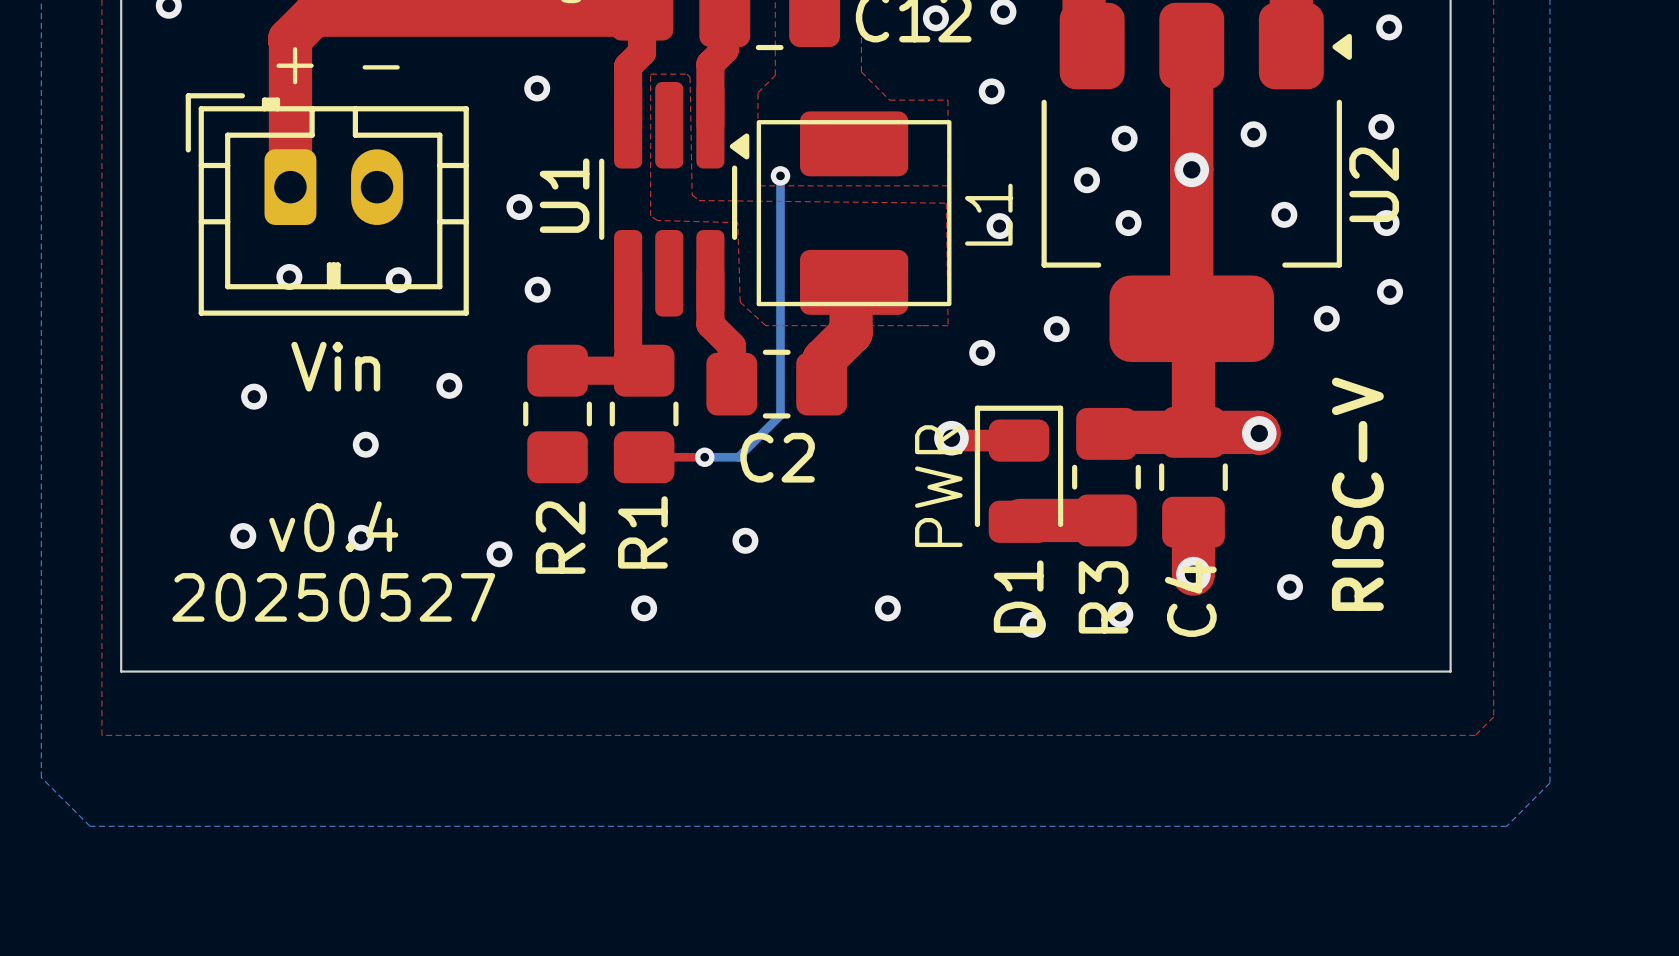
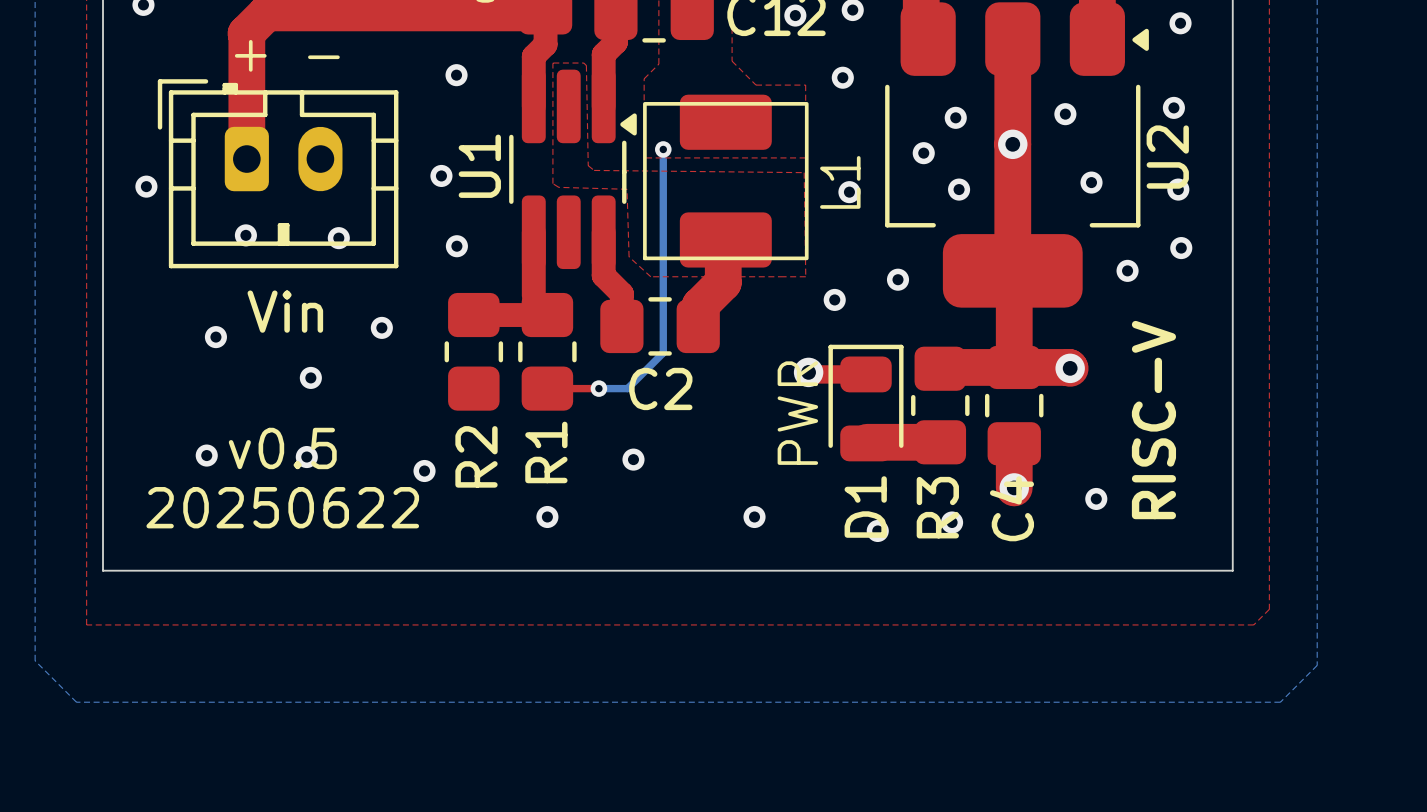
via: none -> (146, 186)
text: v0.4 (333, 526) -> v0.5 (282, 448)
text: 20250527 (333, 597) -> 20250622 (282, 507)

